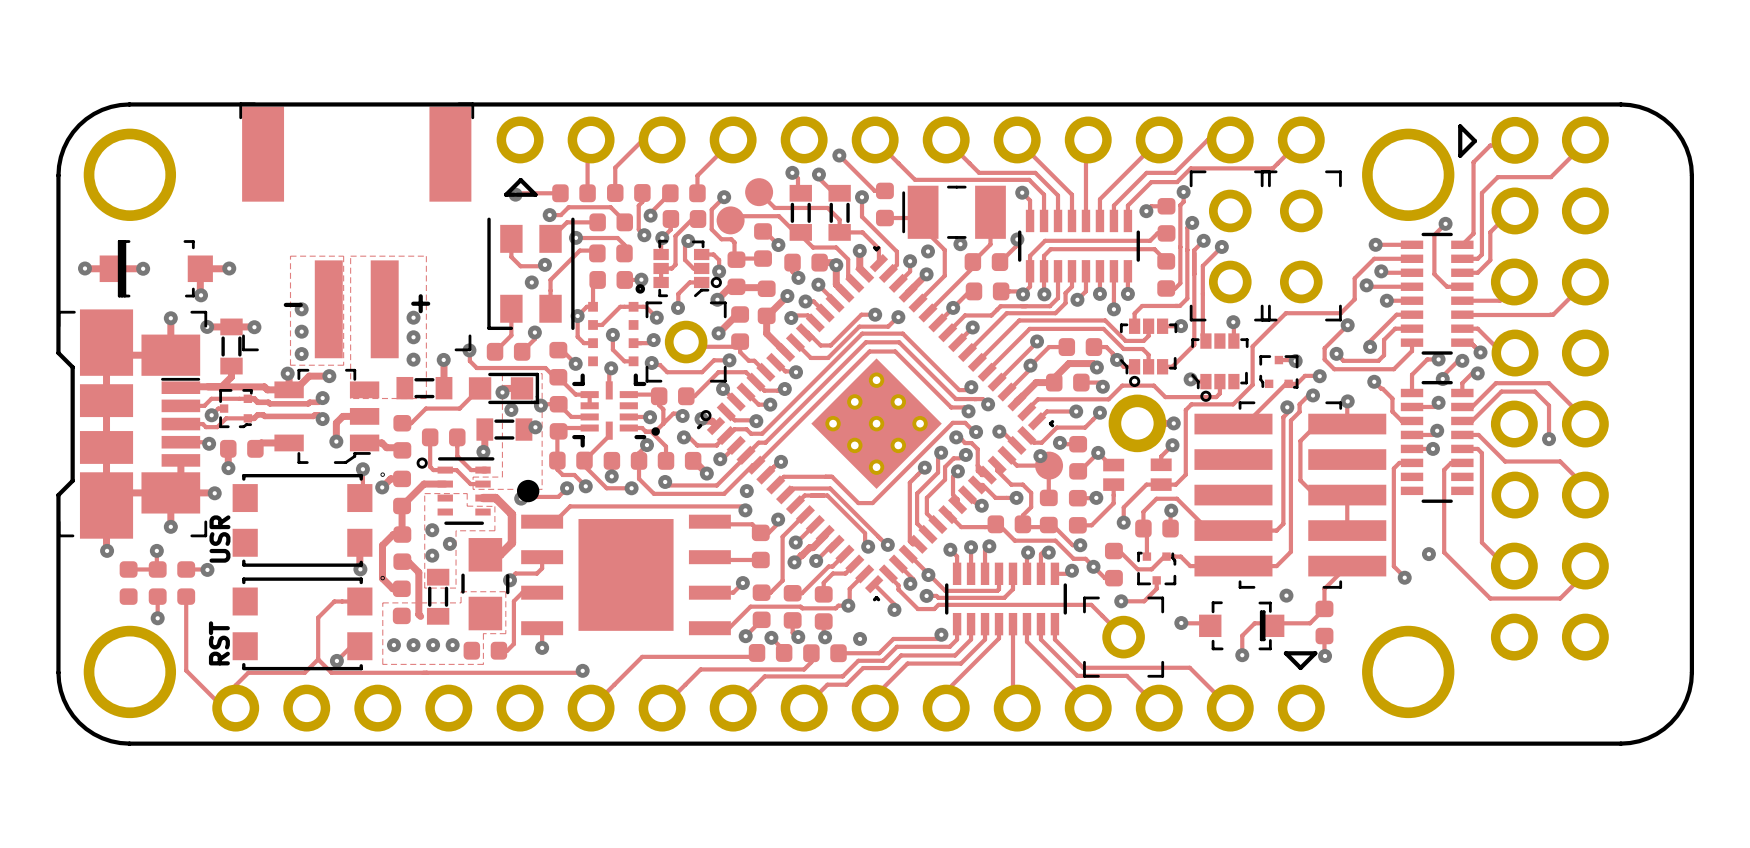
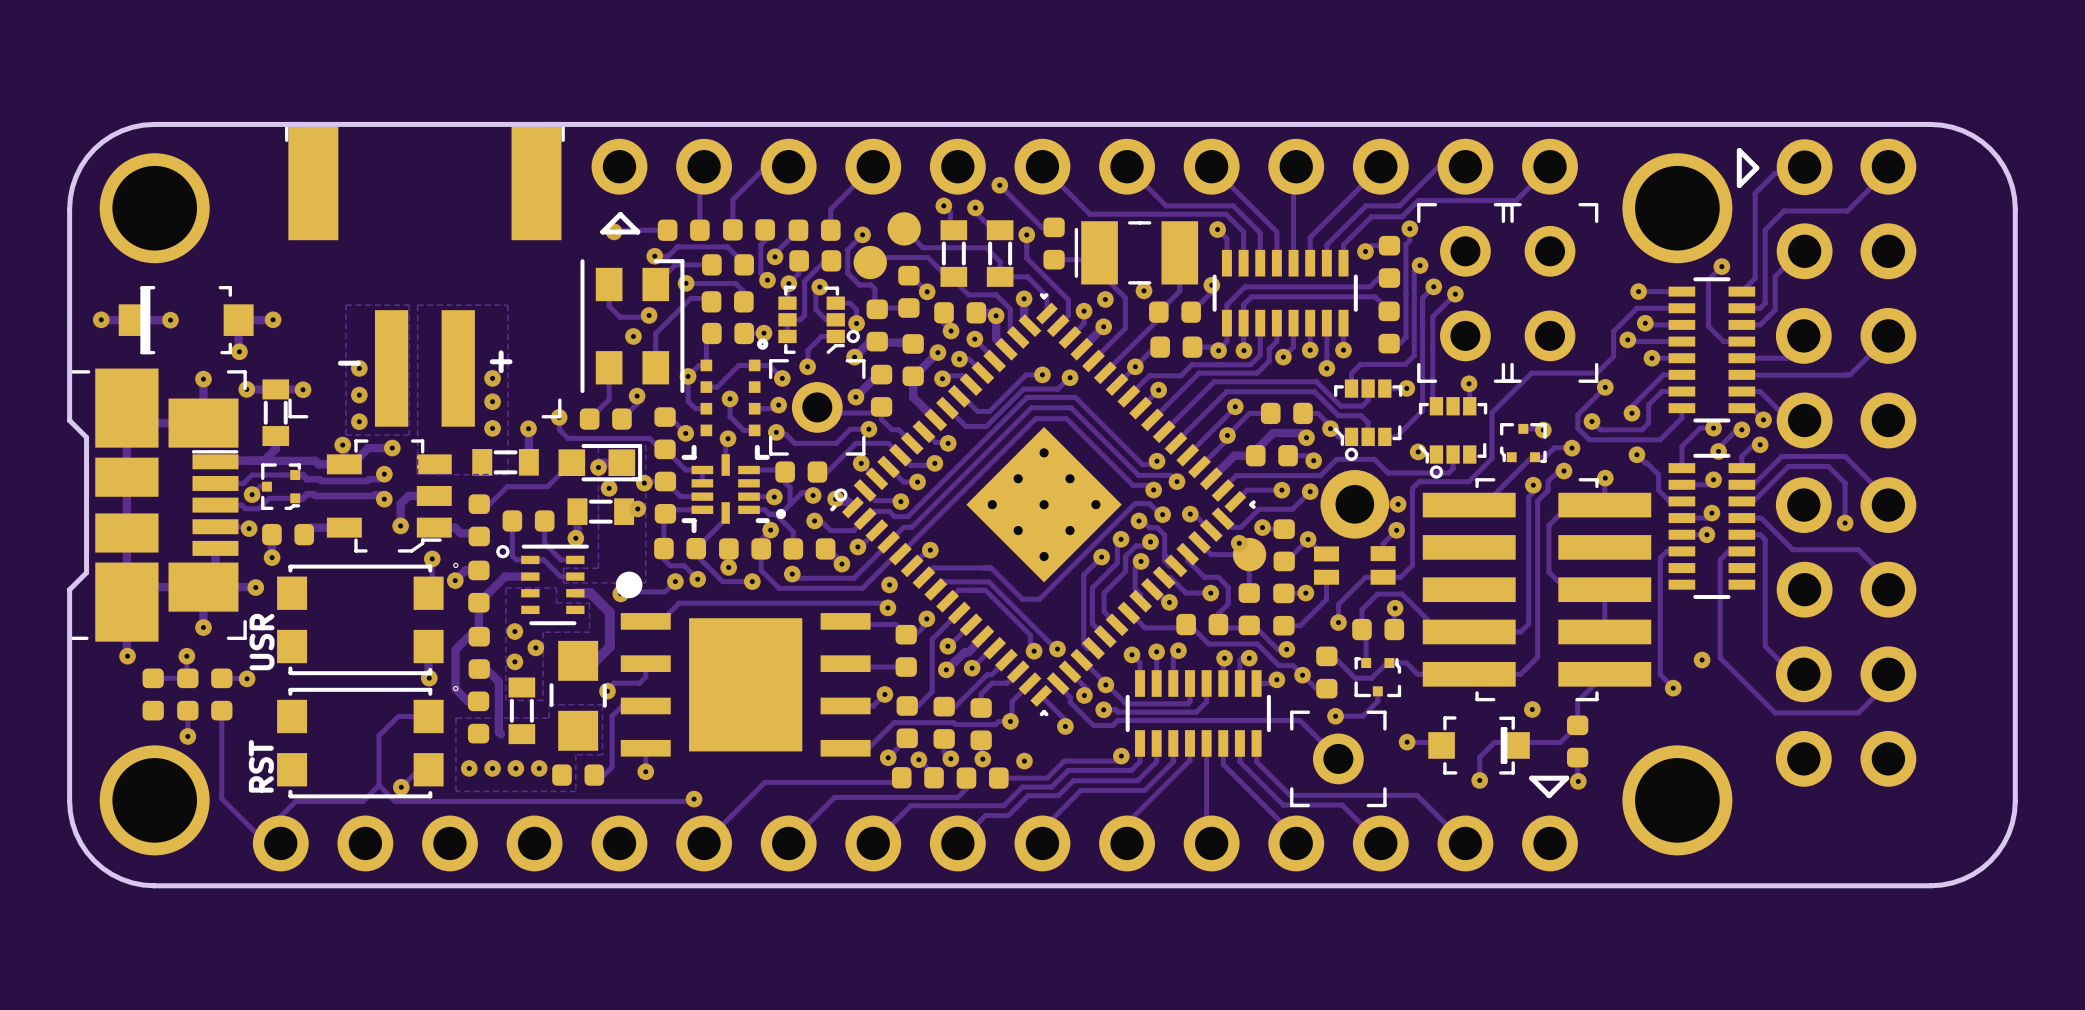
part rotation: 0° (530, 273) -> 180° (632, 326)

